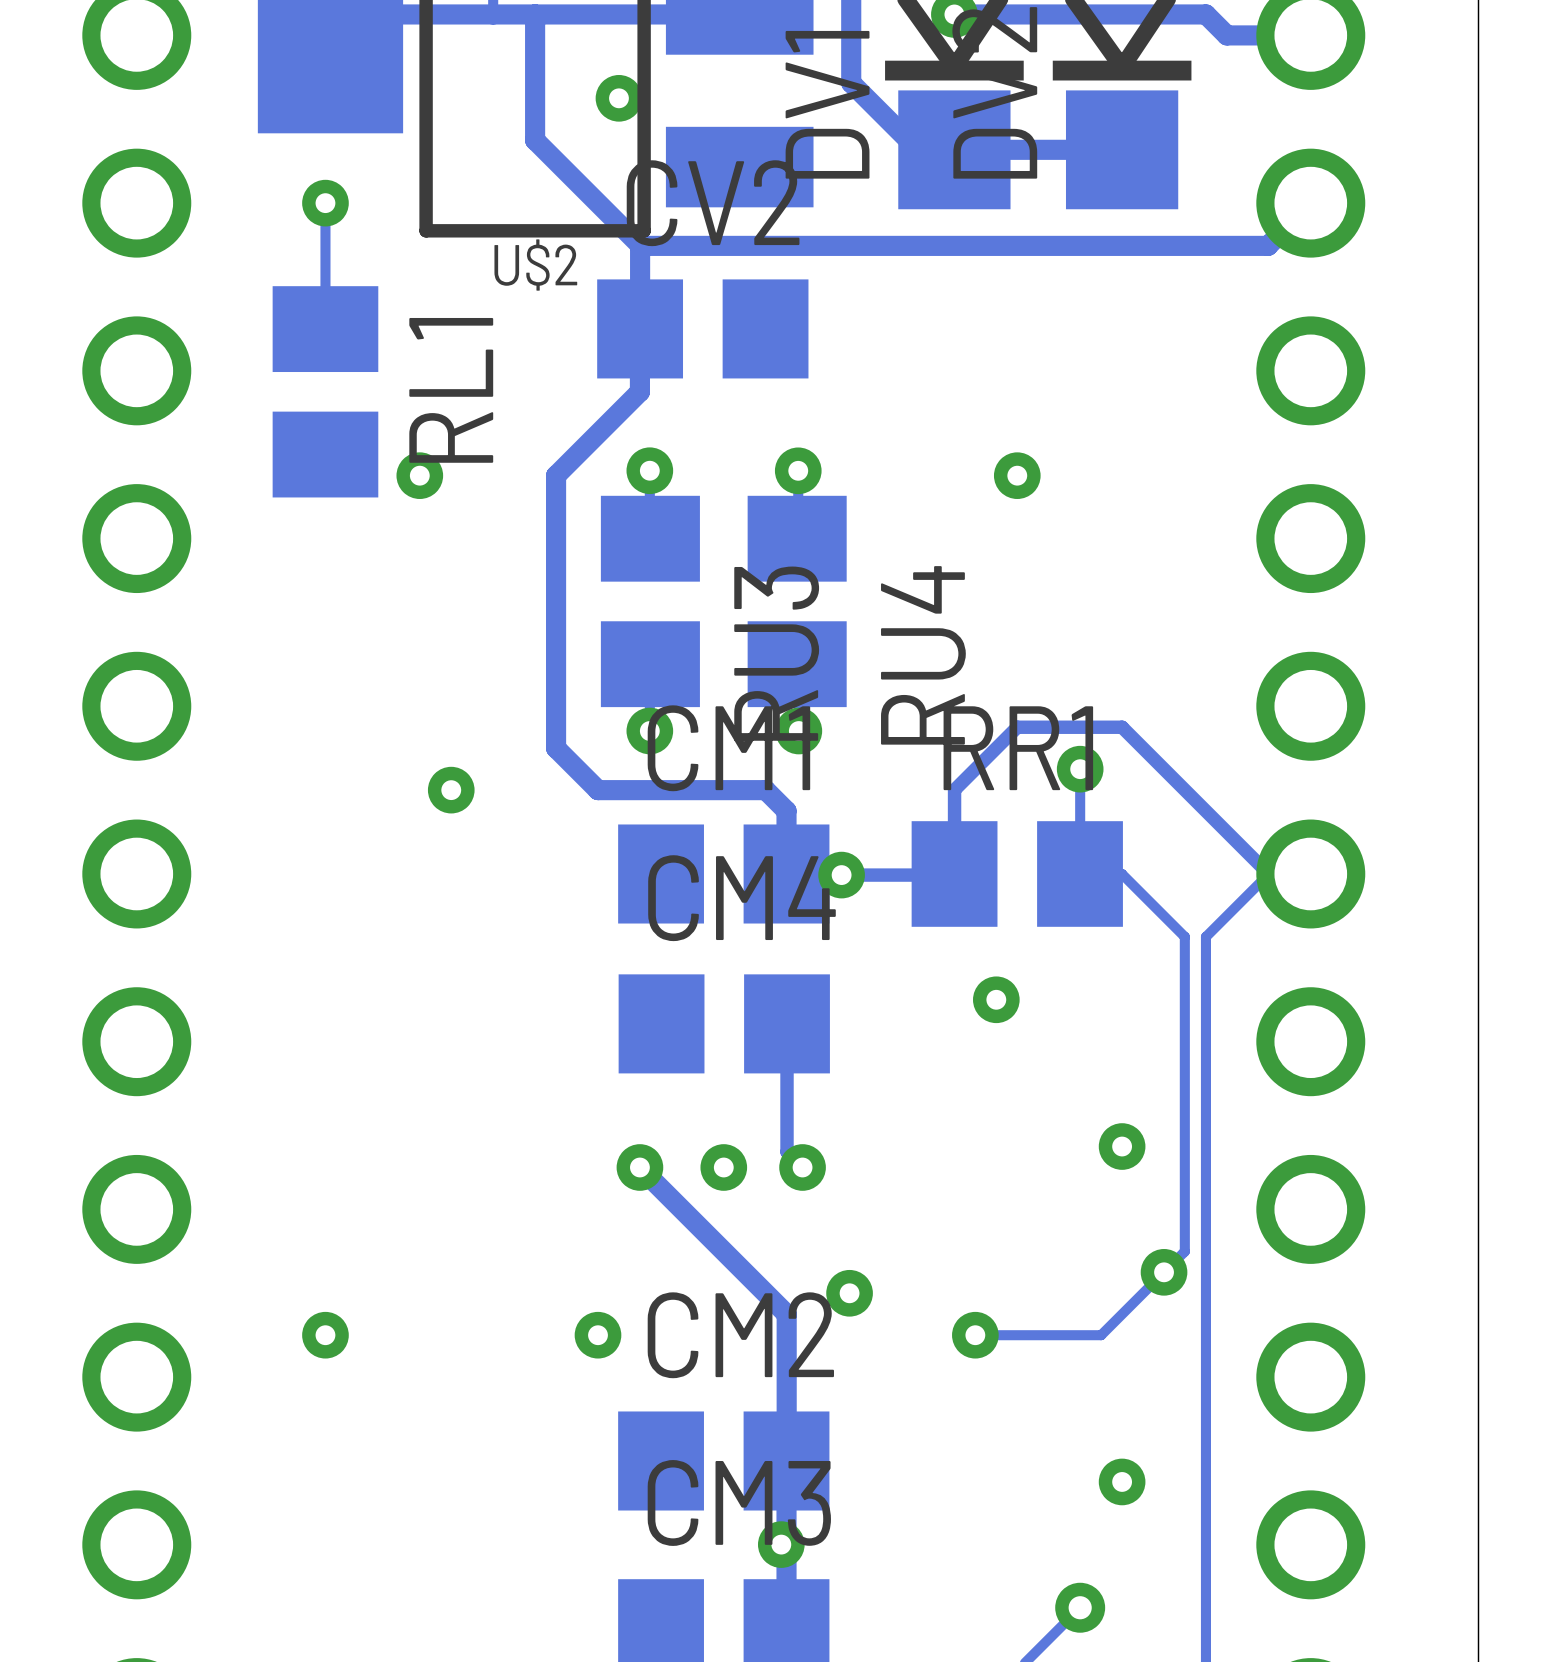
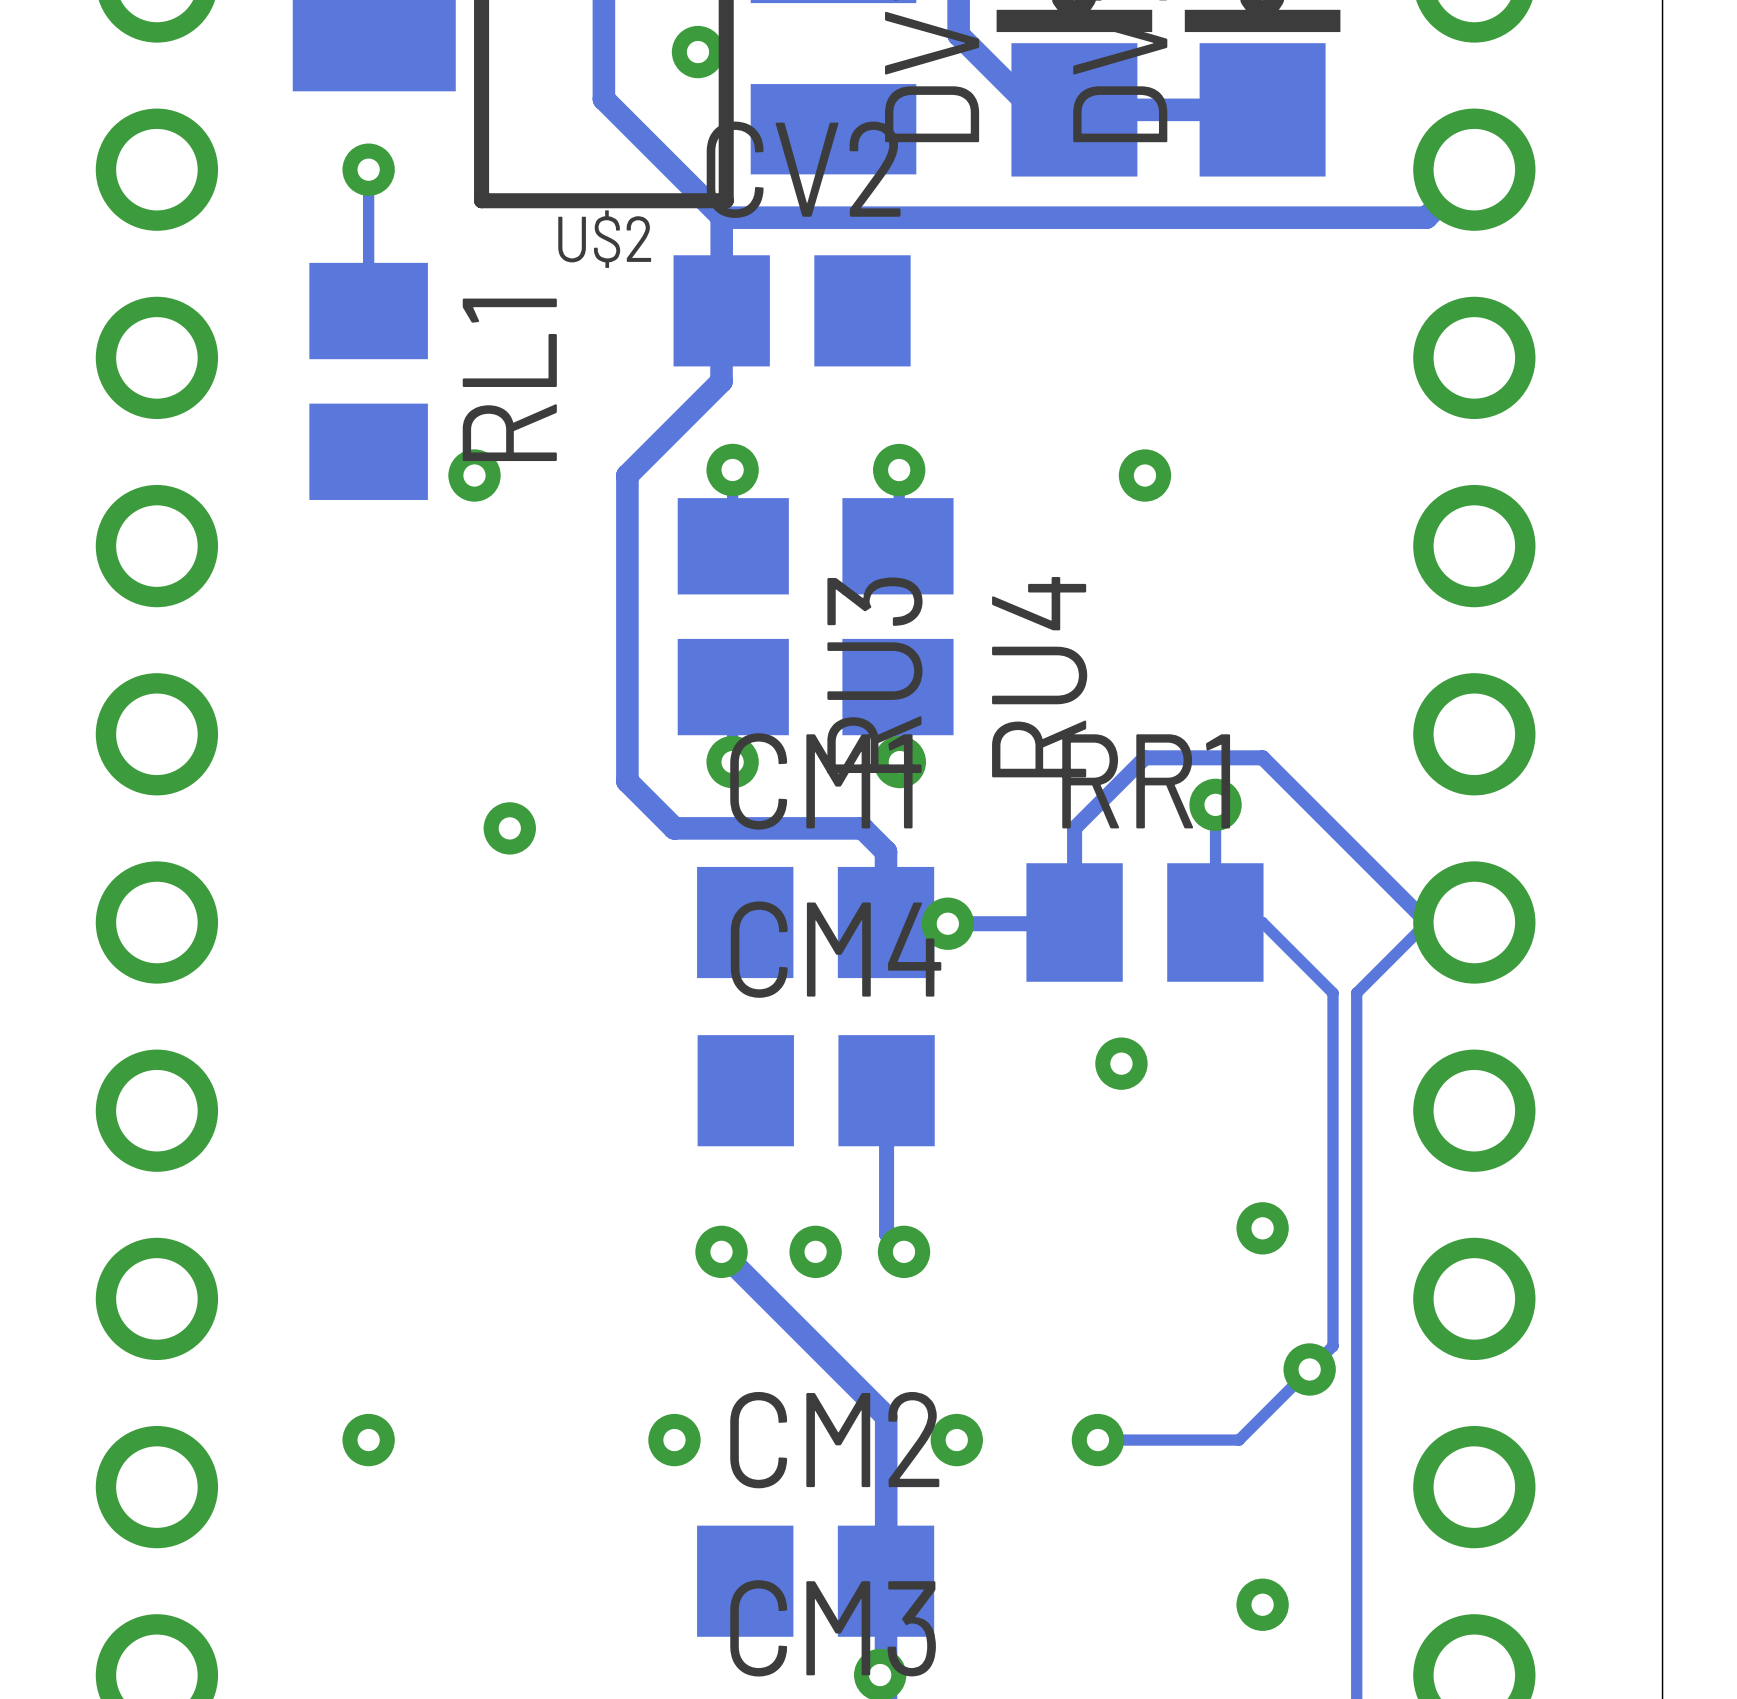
via position: (849, 1293) -> (956, 1440)

